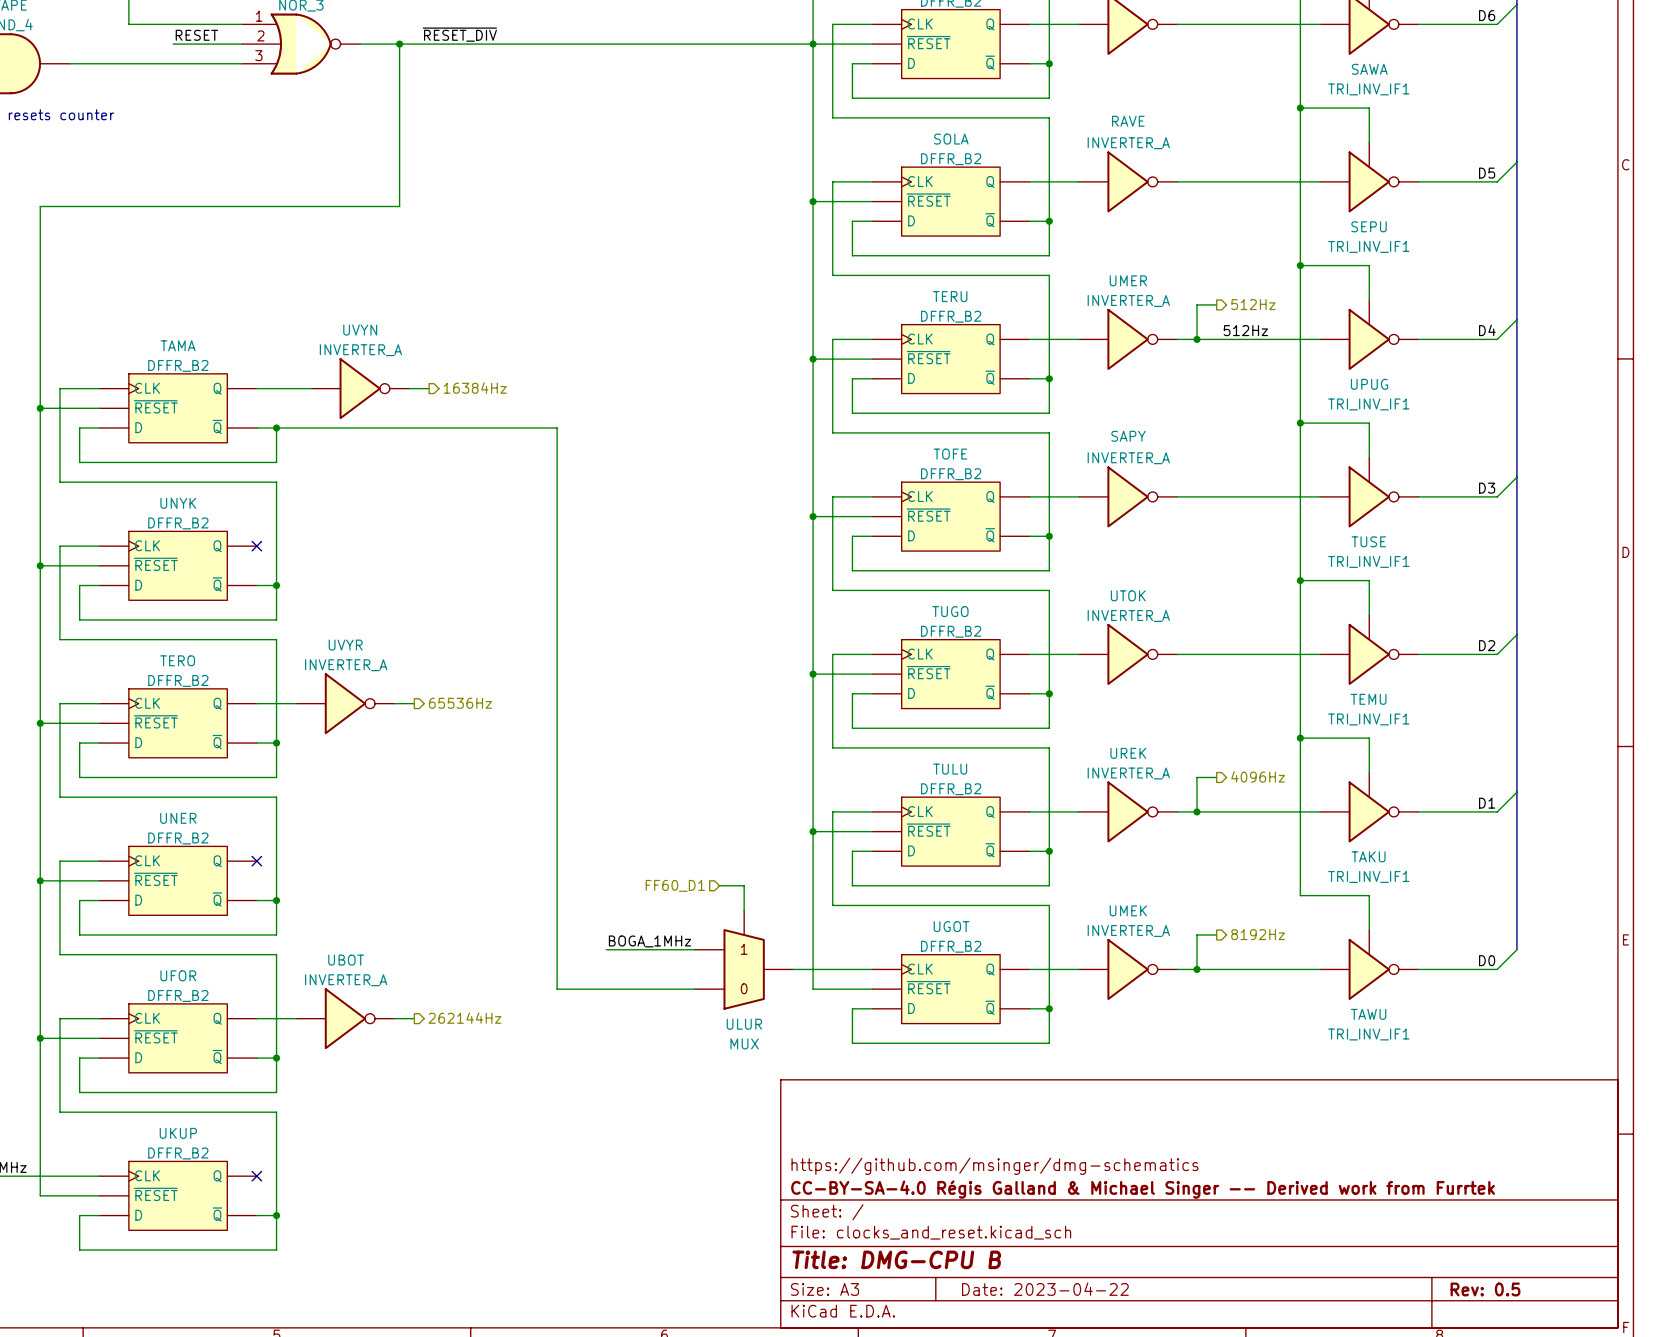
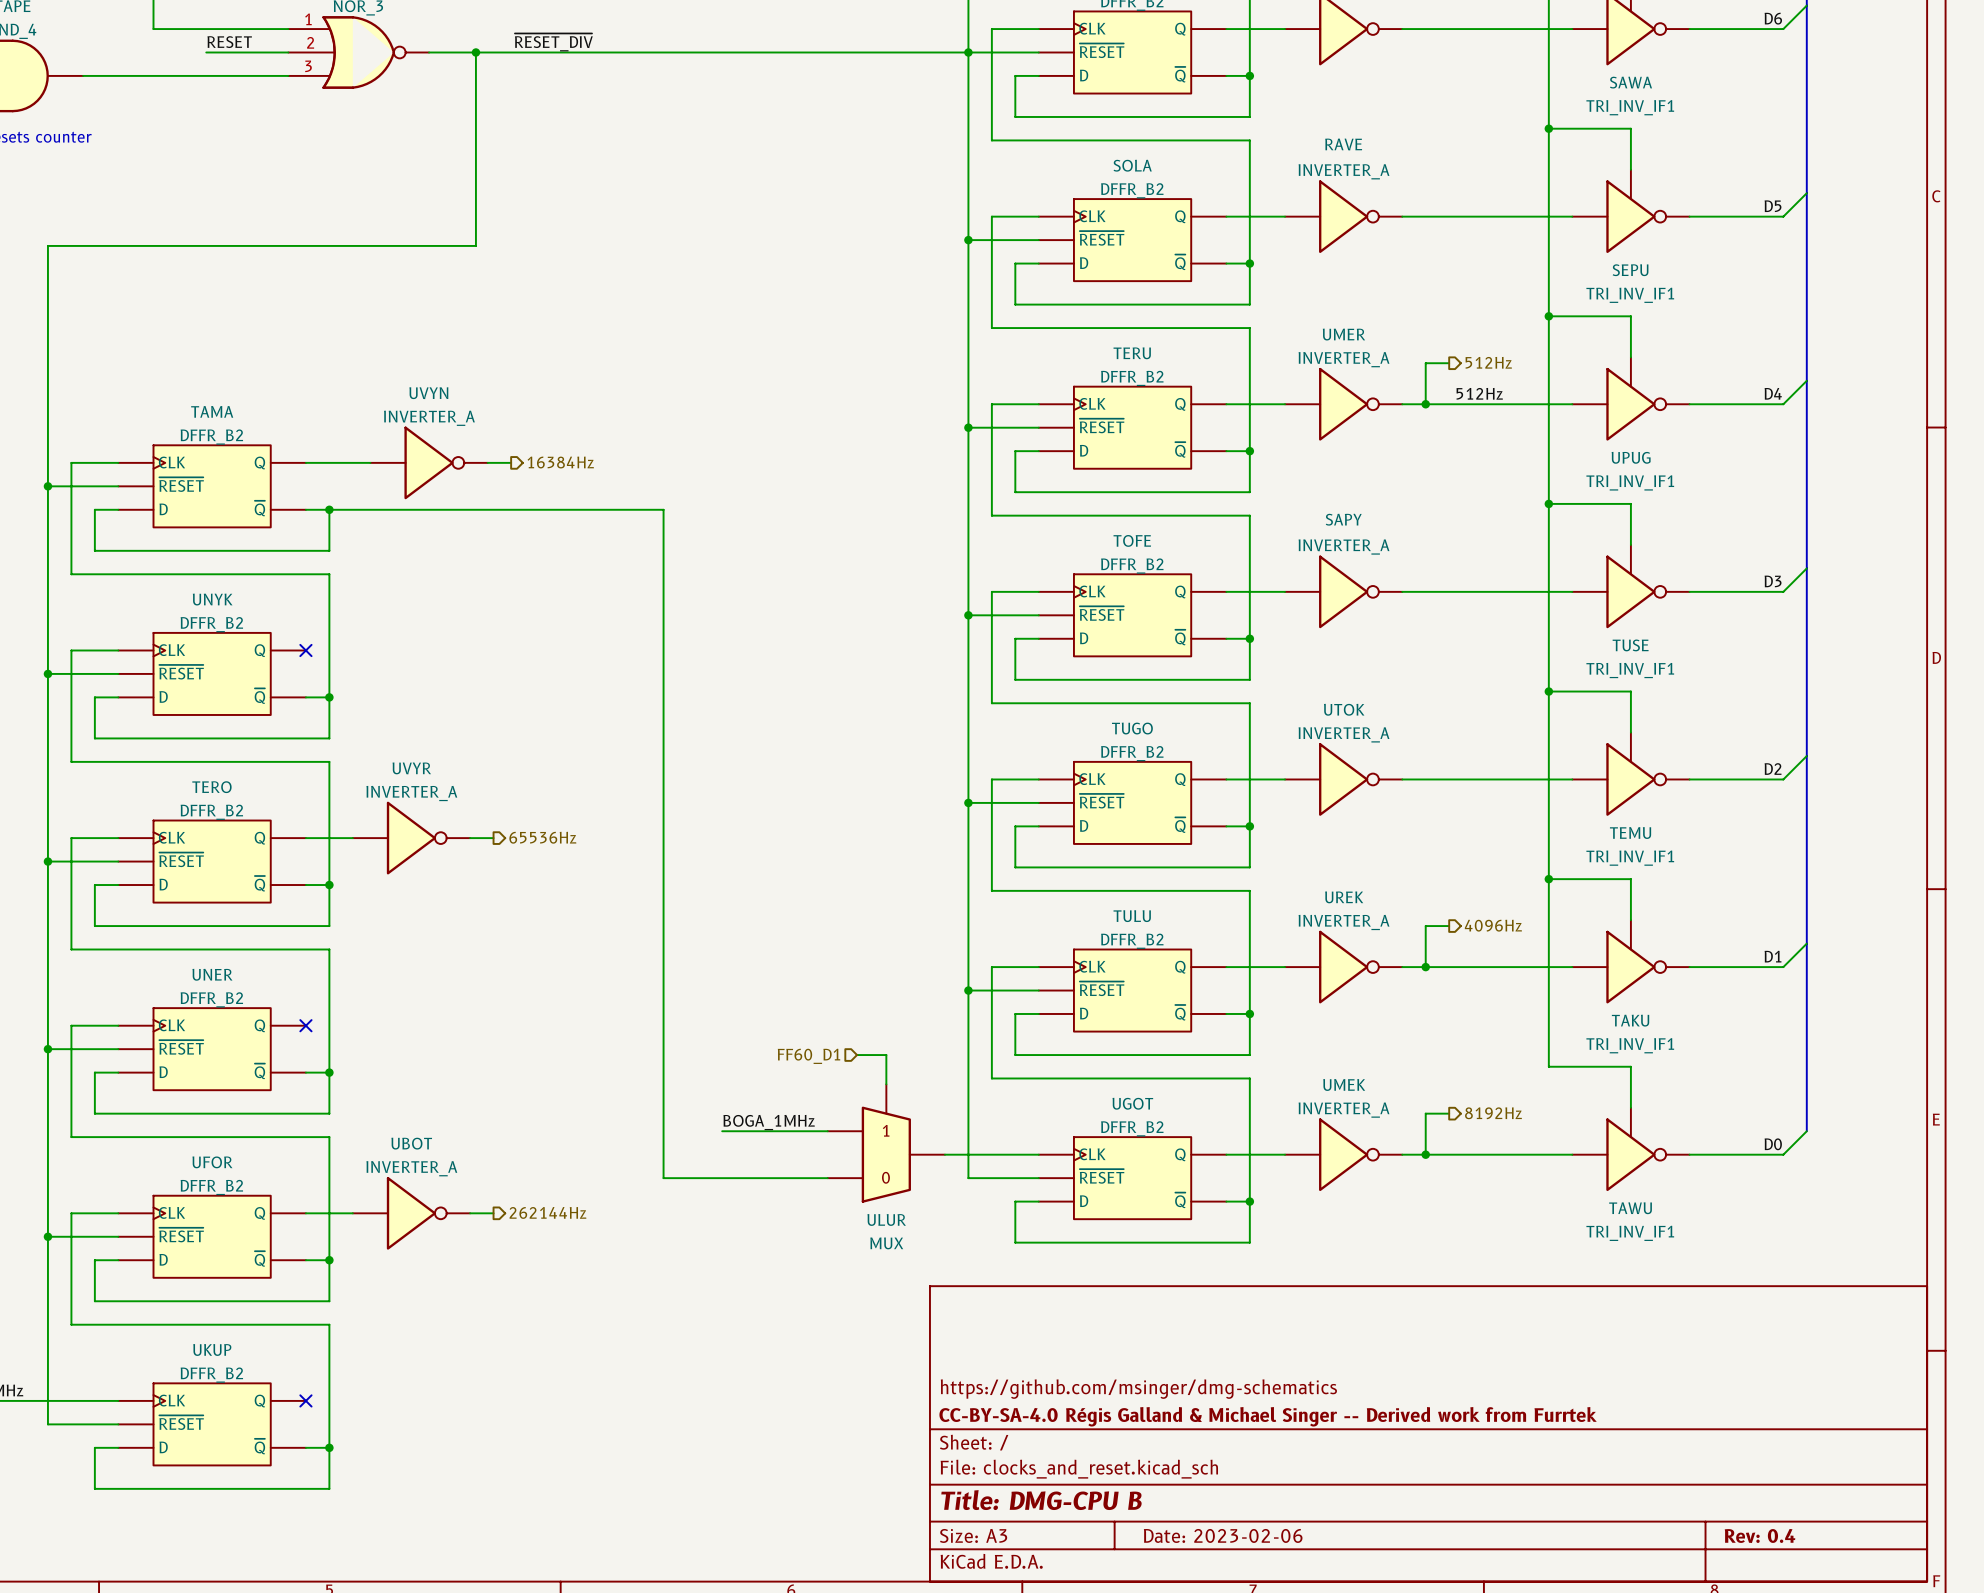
title block: Date: 2023-04-22 (1045, 1289) -> Date: 2023-02-06 (1223, 1535)
title block: Rev: 0.5 (1485, 1289) -> Rev: 0.4 (1760, 1535)

